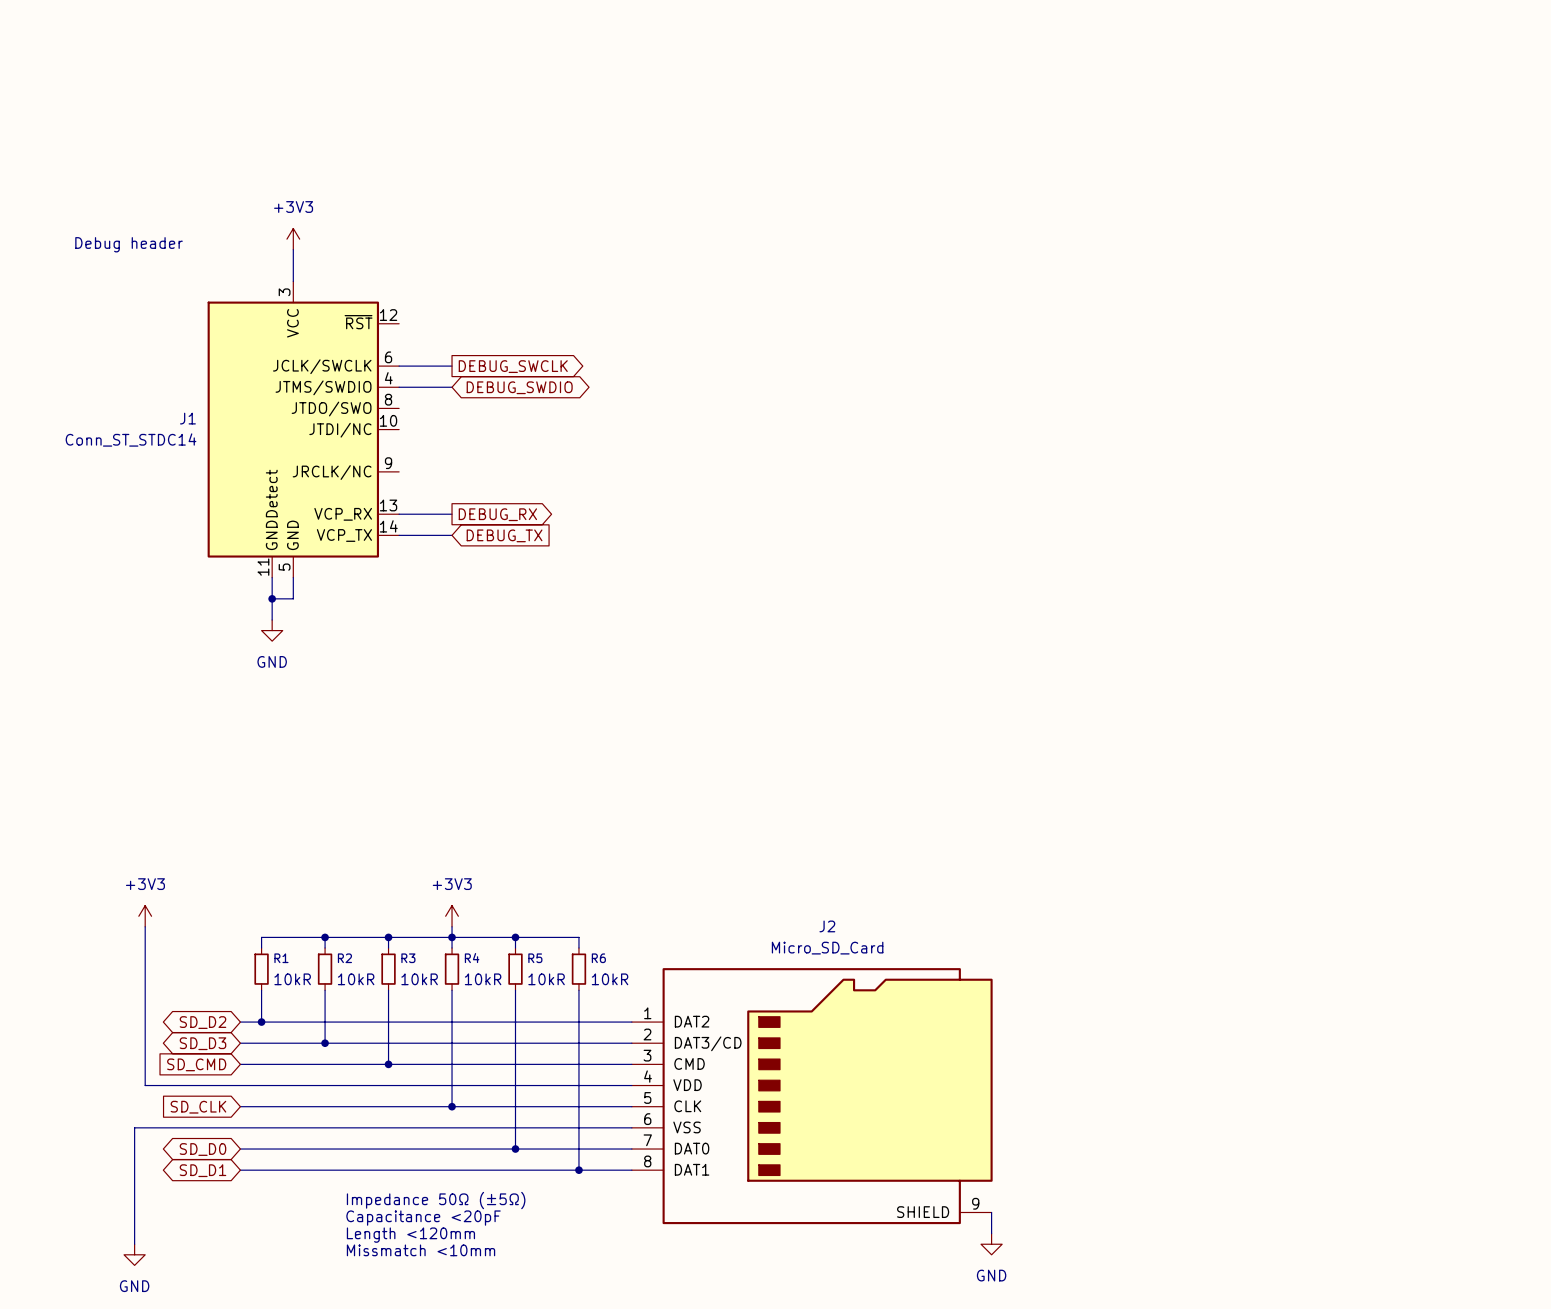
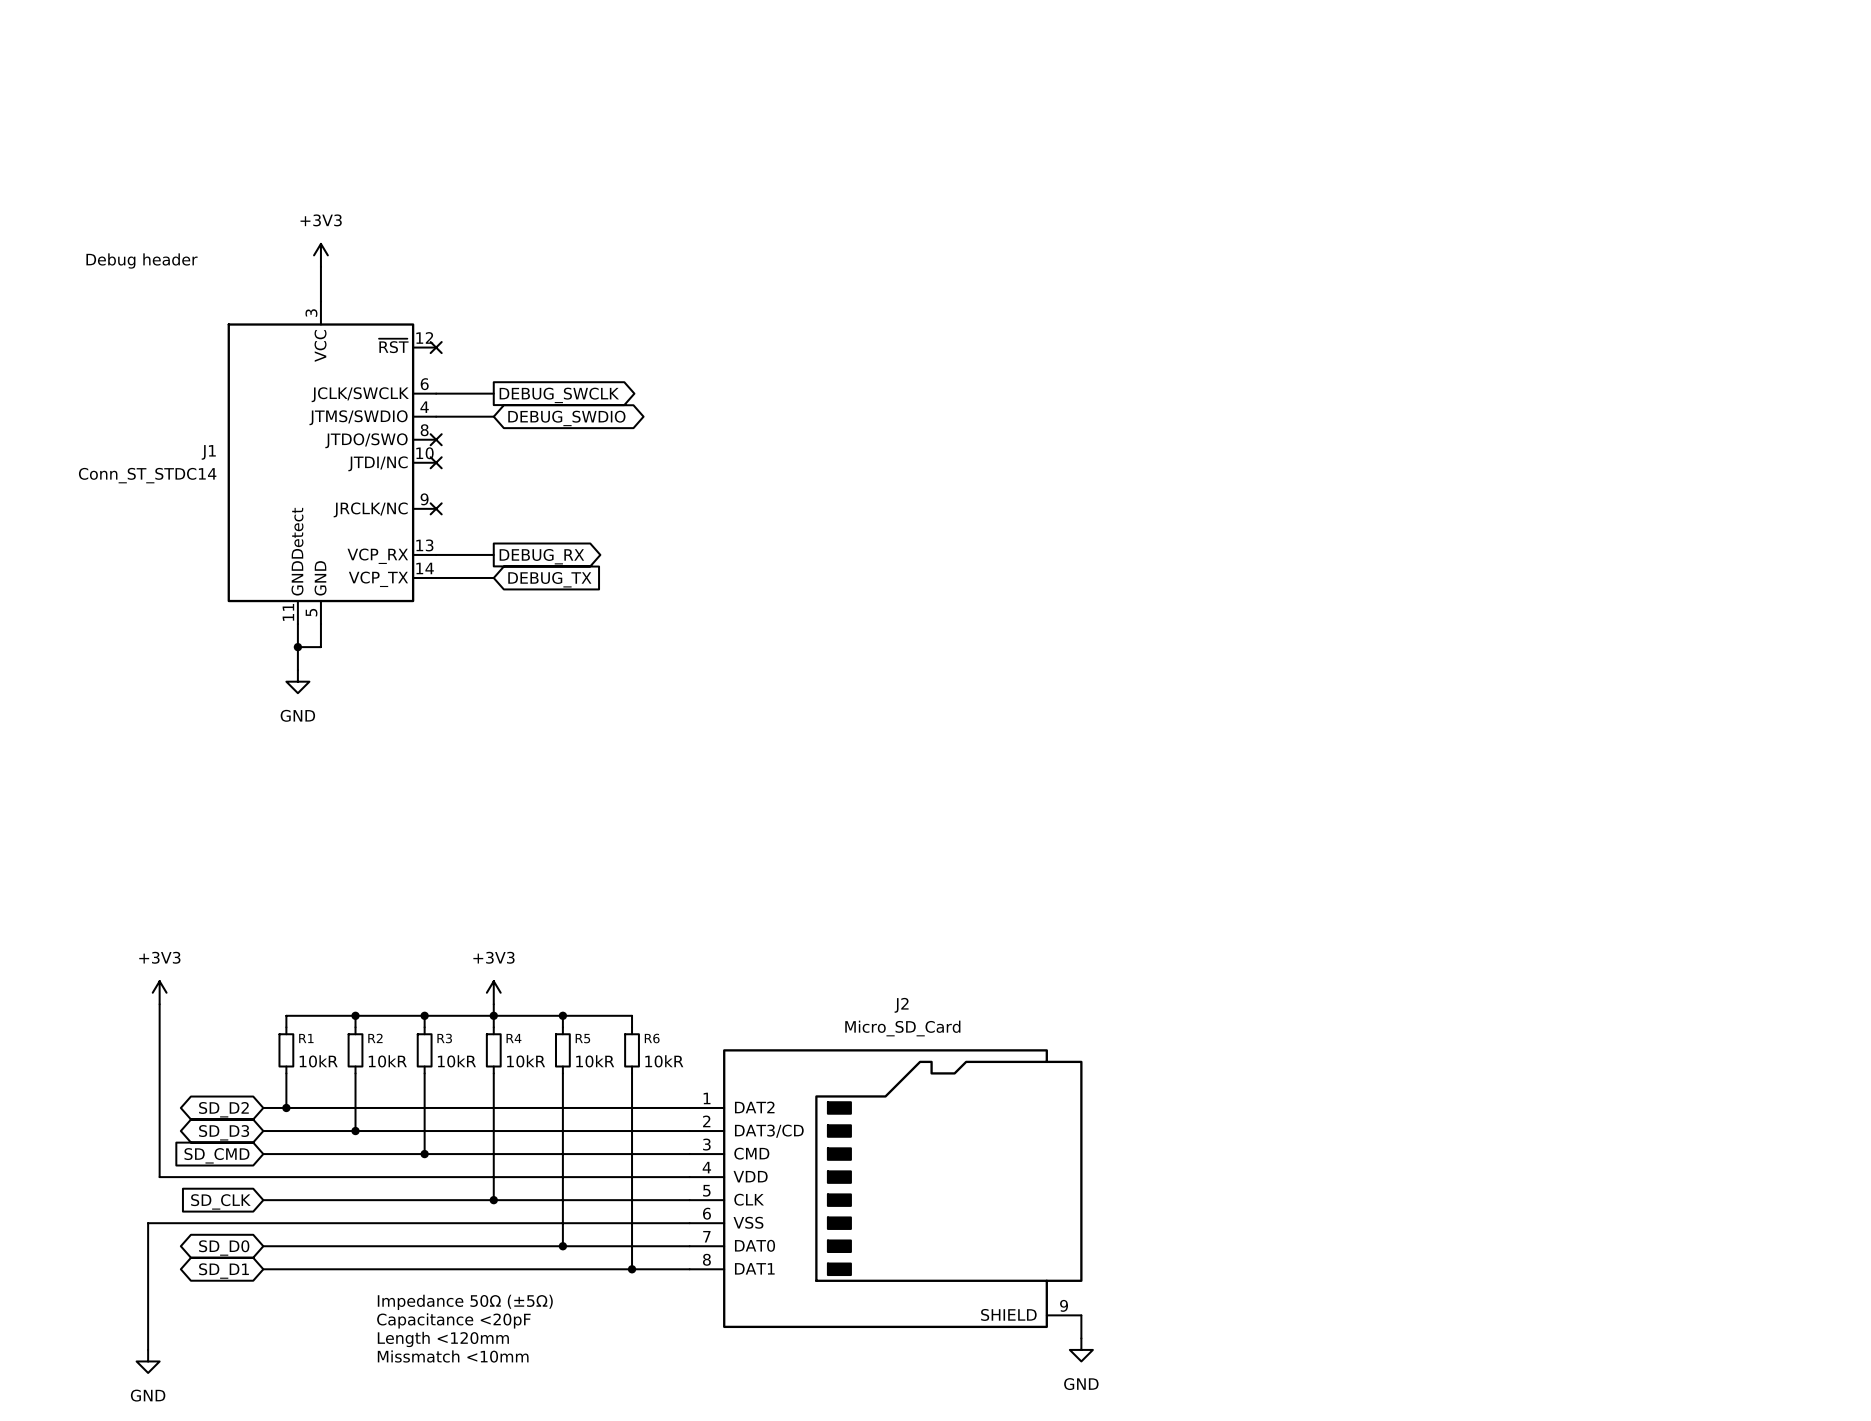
no-connect mark: none -> (436, 347)
no-connect mark: none -> (436, 439)
no-connect mark: none -> (436, 462)
no-connect mark: none -> (436, 508)

